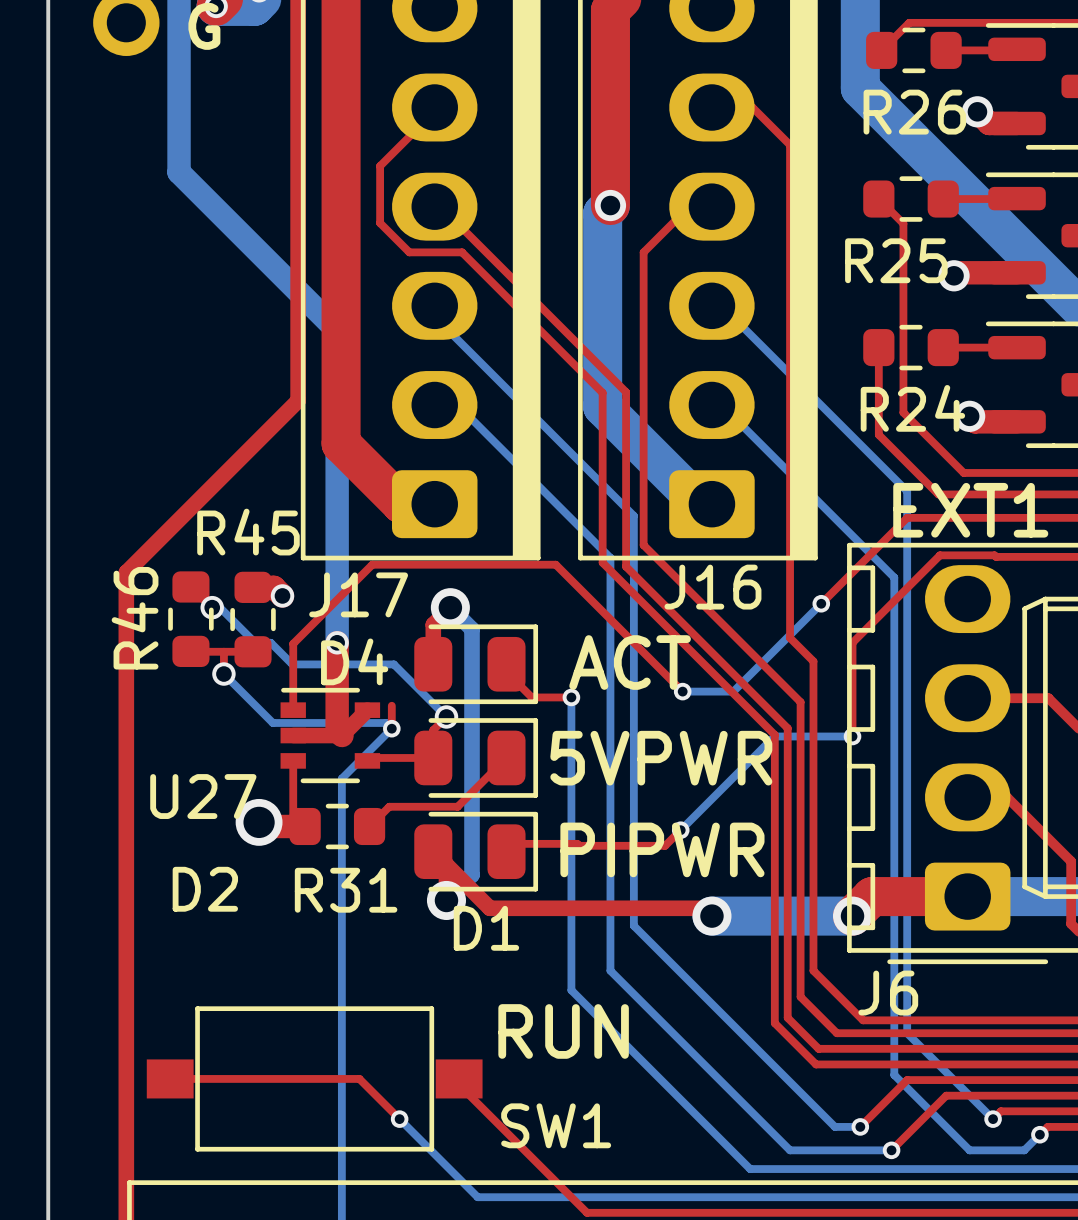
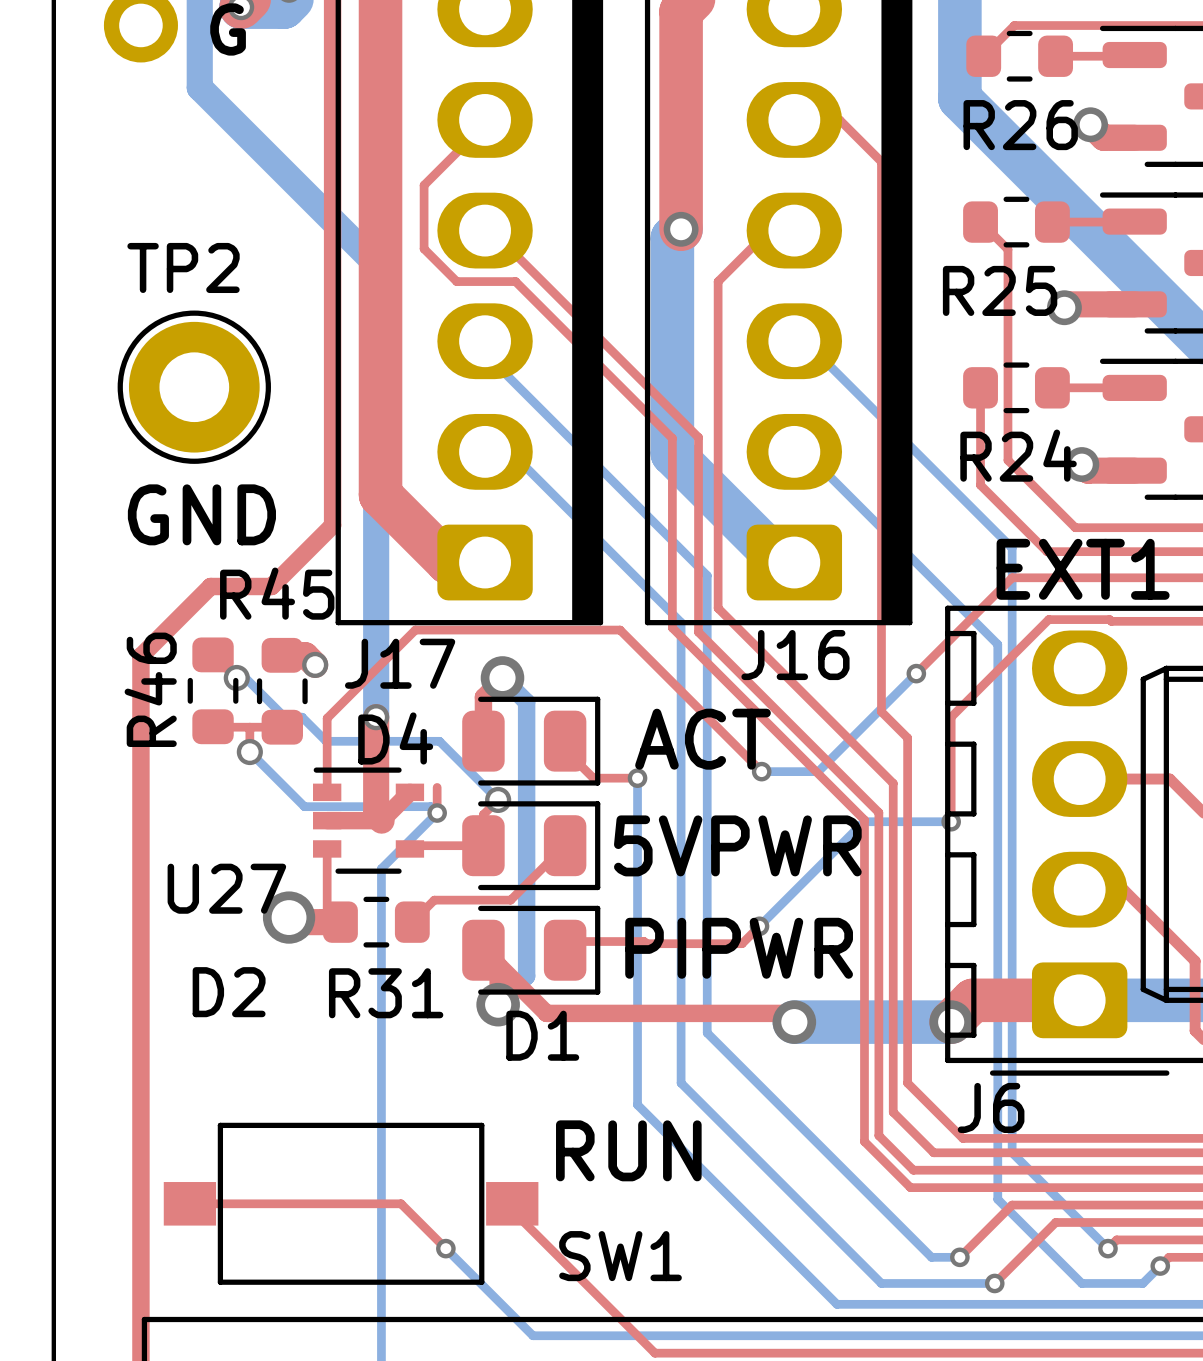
bottom track: (179, 78) (179, 172) (337, 330) -> (199, 87) (376, 264) (376, 368)
TP2: none -> (194, 387)
top track: (298, 400) (126, 572) (126, 588) -> (332, 447) (332, 525) (271, 586) (210, 586) (140, 656)
text: none -> GND (201, 514)

